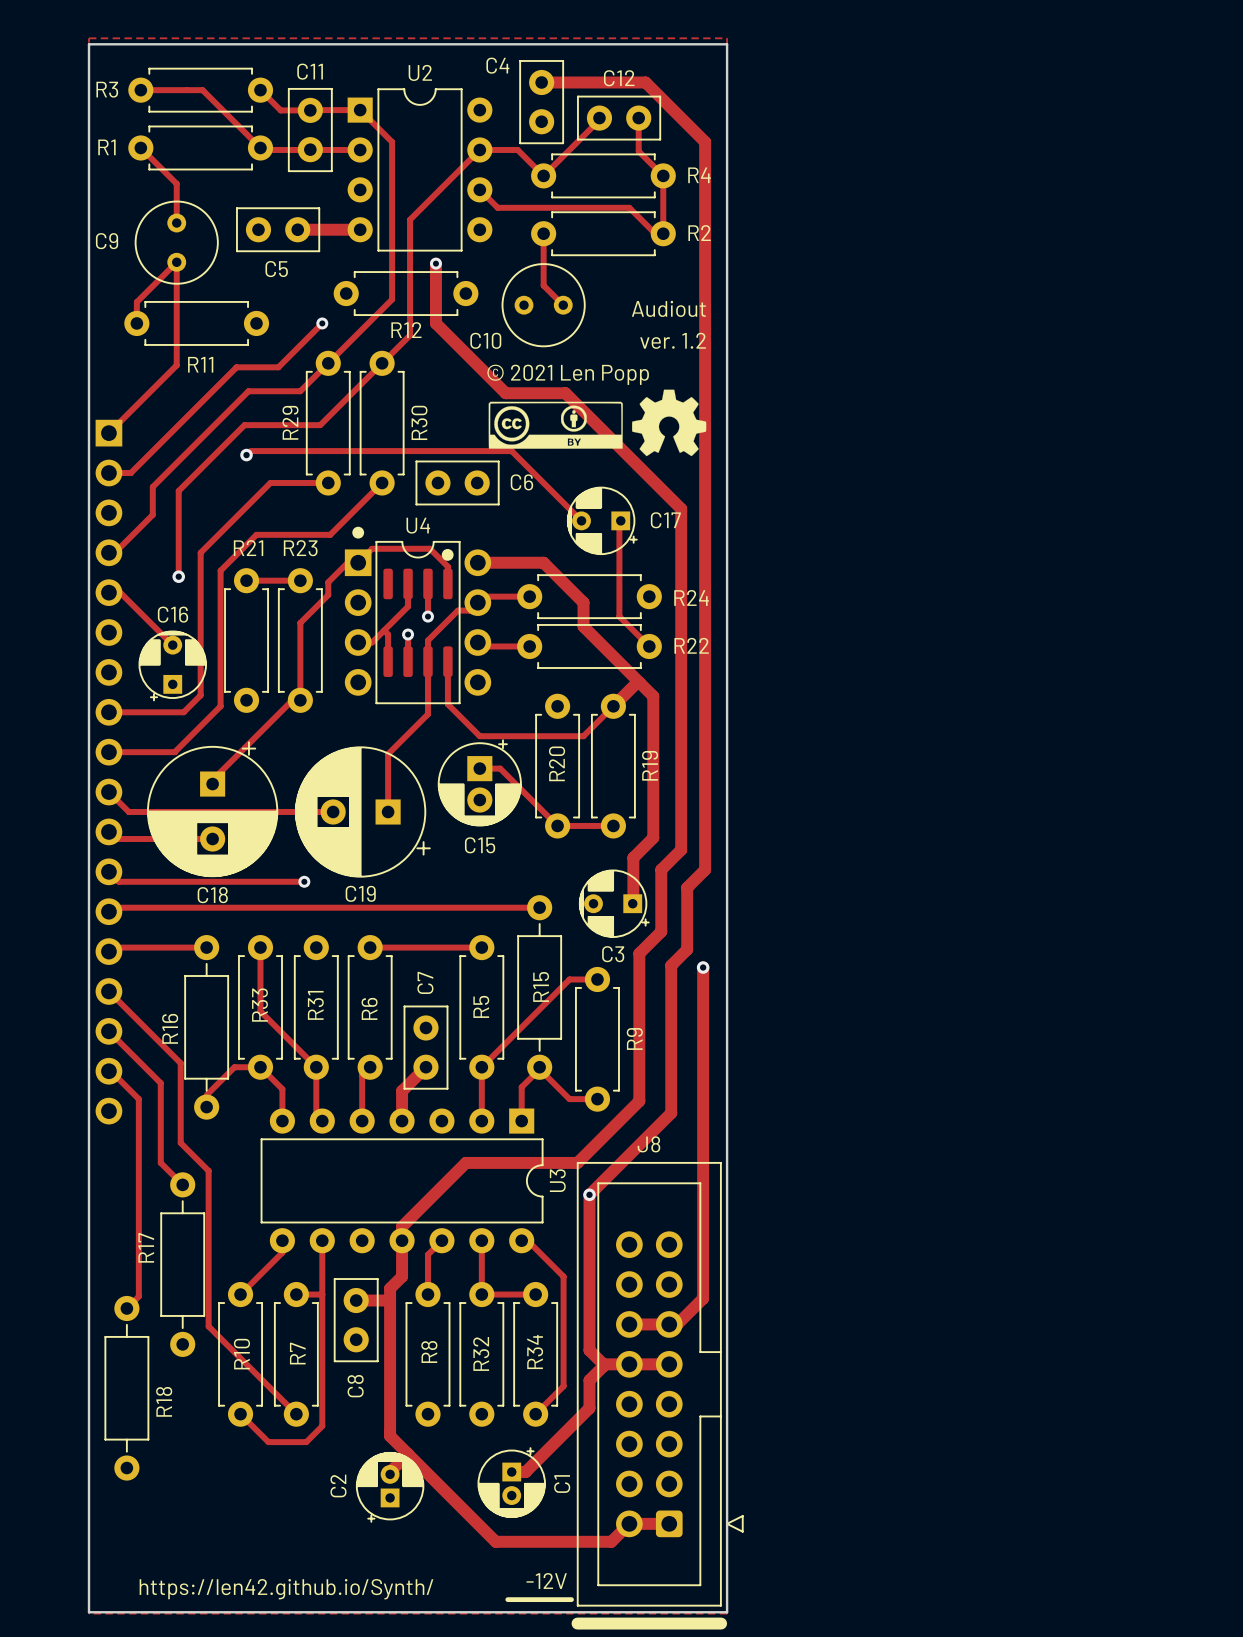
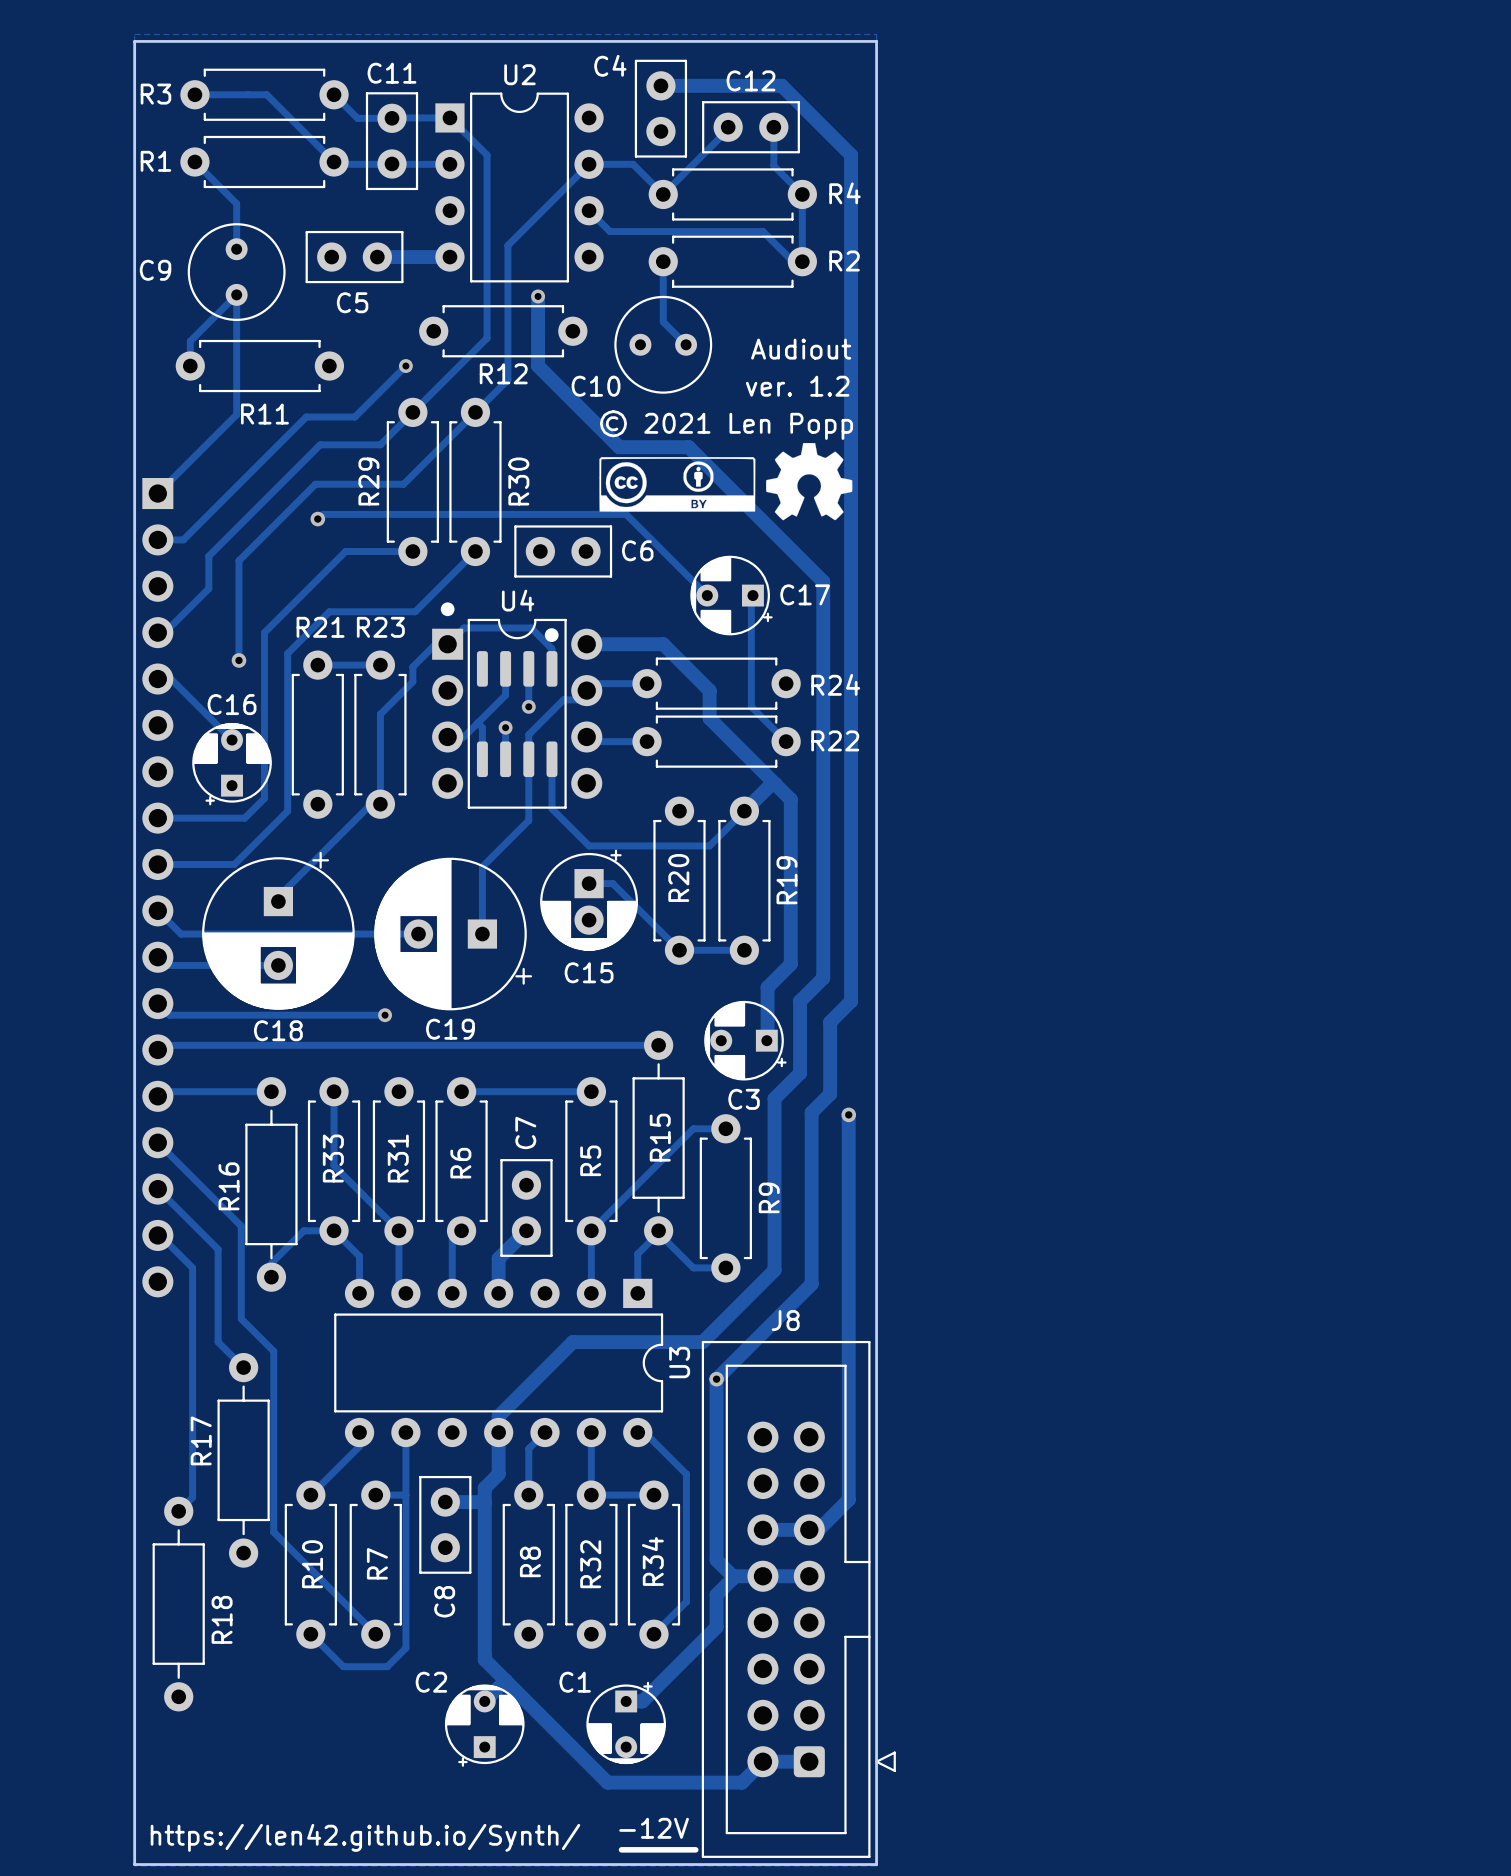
C1 footprint: [477, 1447, 546, 1519] -> [586, 1681, 666, 1765]
C2 footprint: [355, 1451, 425, 1523] -> [444, 1684, 525, 1767]
C1 name rotation: 0° (562, 1484) -> 90° clockwise (575, 1682)
C1 name position: C1 (562, 1484) -> C1 (575, 1682)
C2 name rotation: 0° (338, 1486) -> 90° clockwise (431, 1682)

